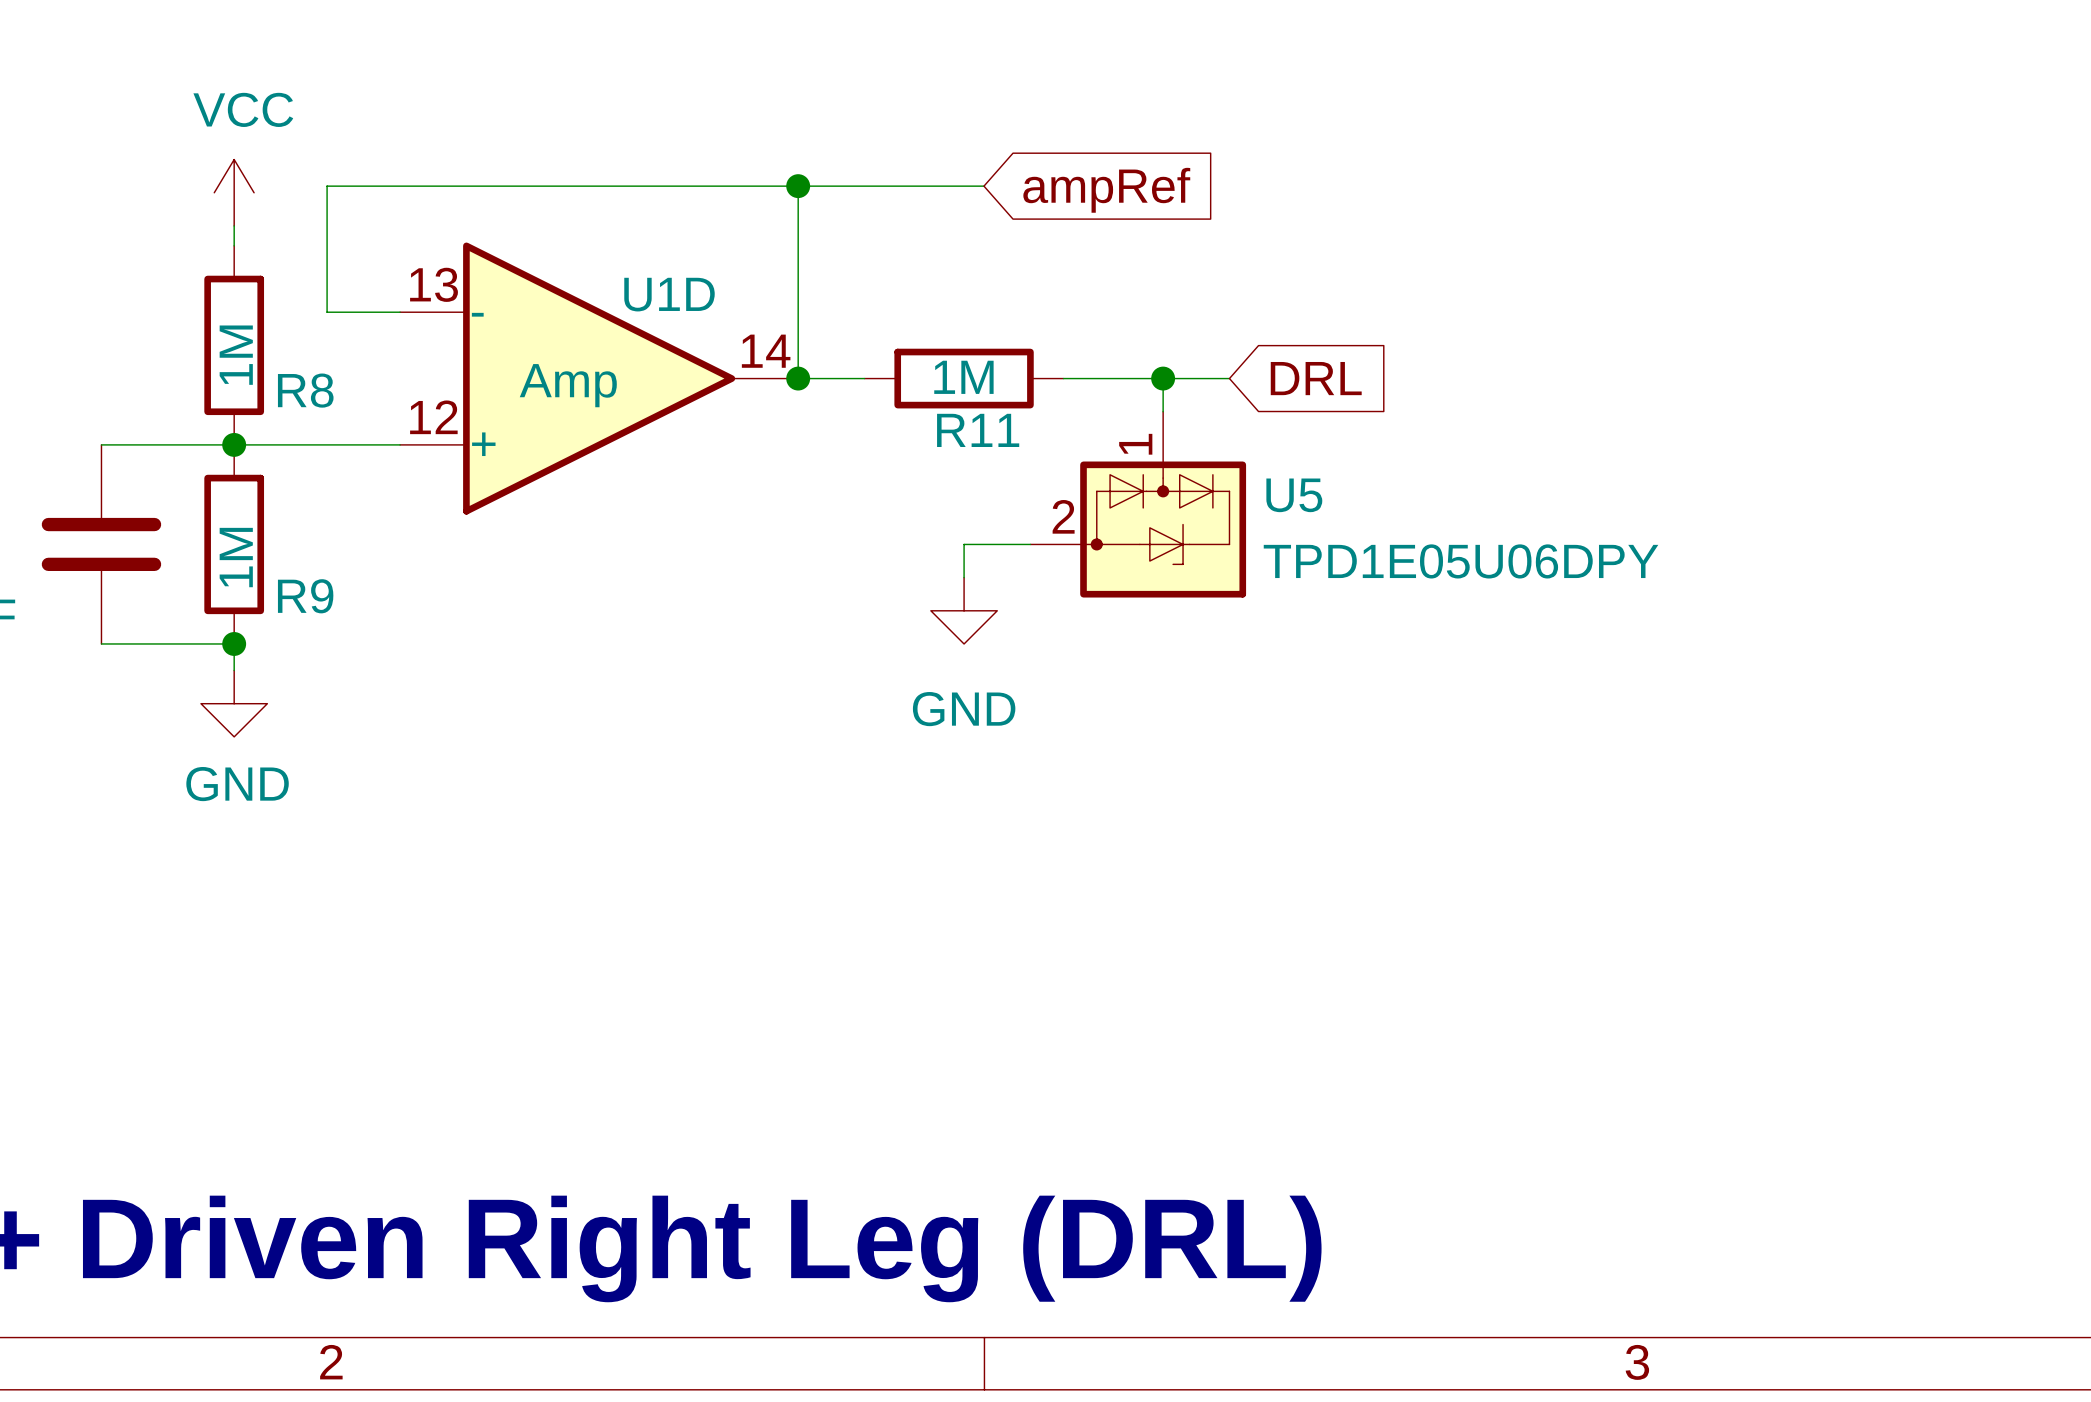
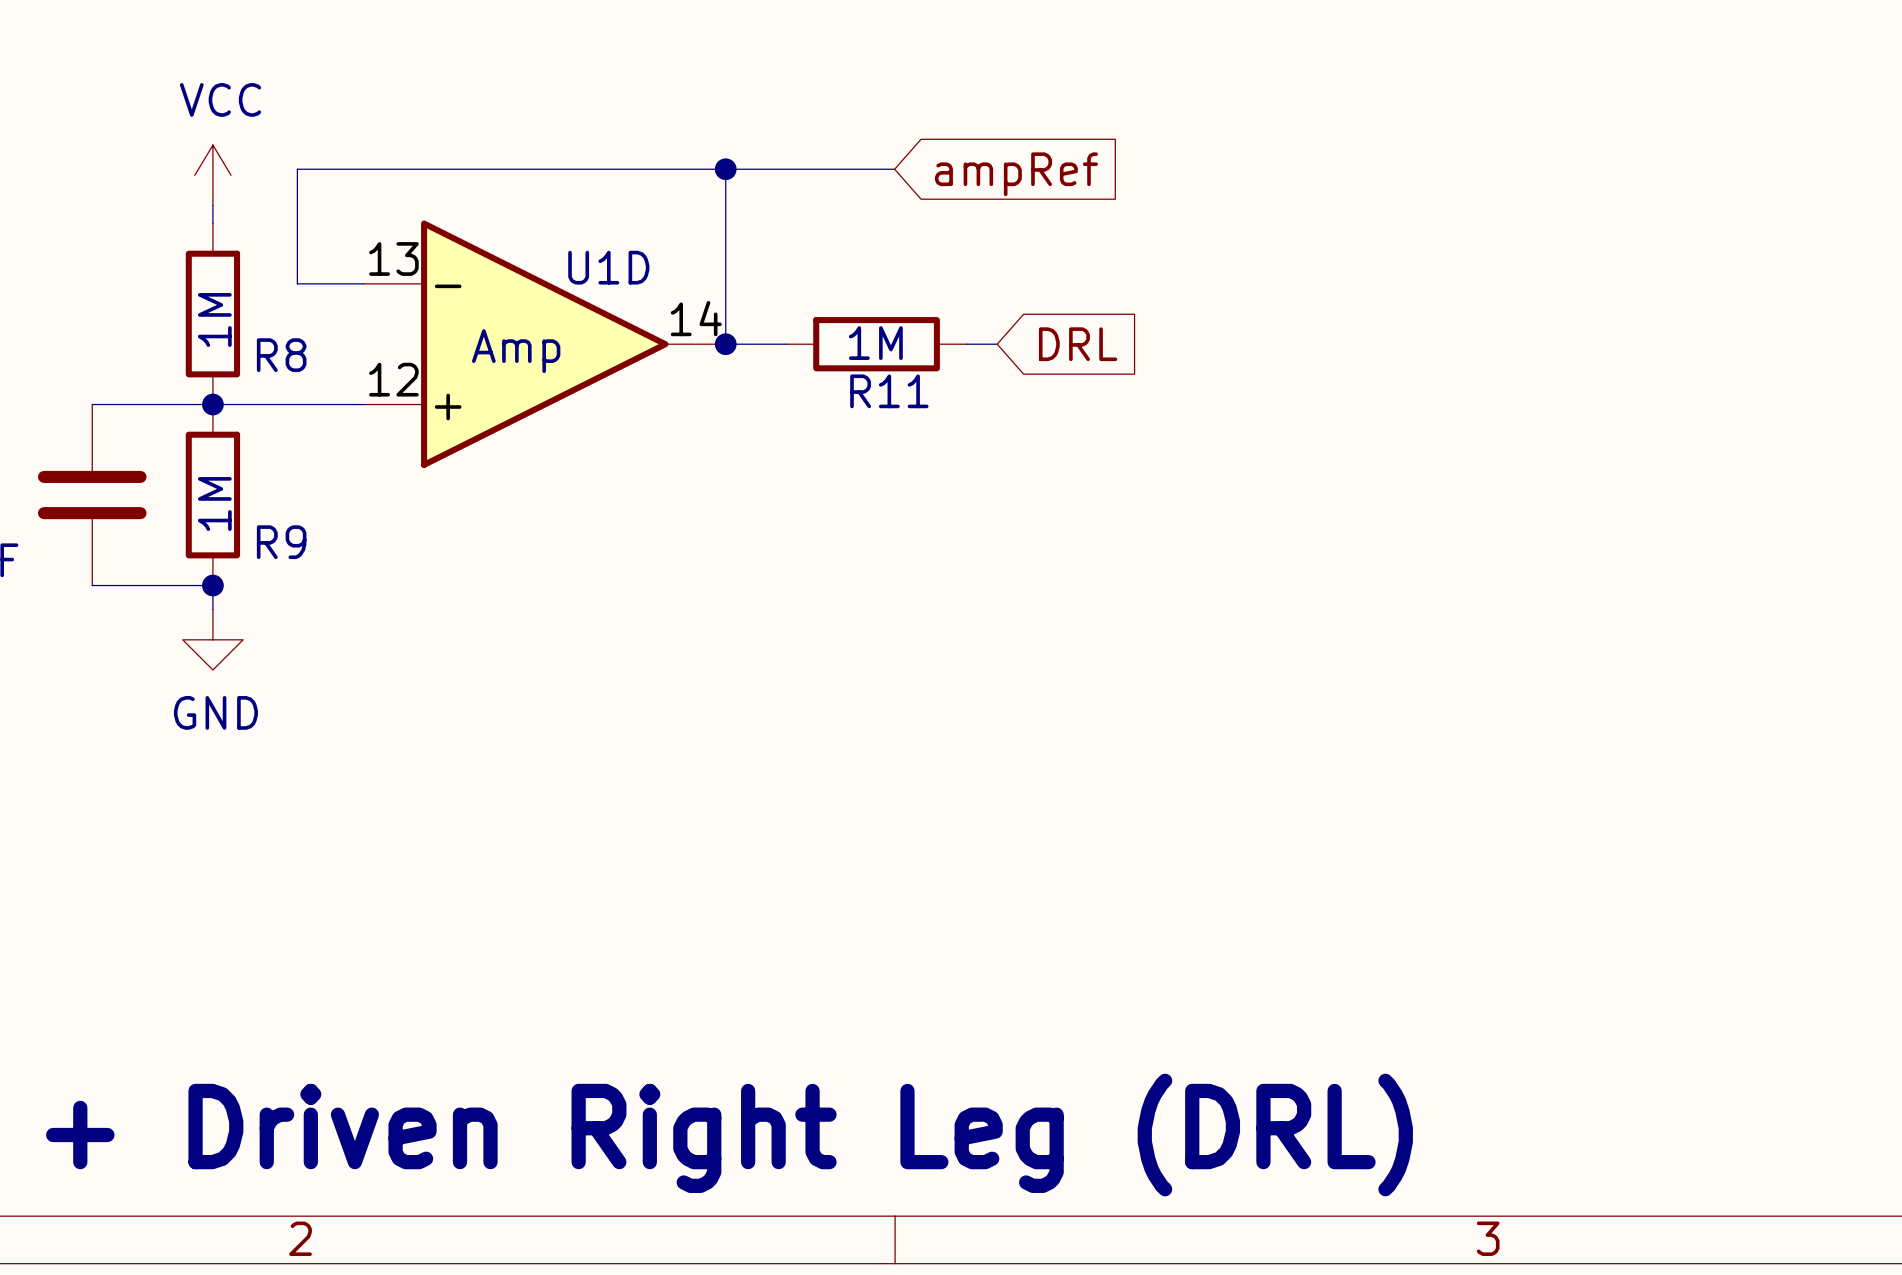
wire: (1096, 378) (1229, 378) -> none
wire: (1163, 378) (1163, 411) -> none
junction: (1163, 378) -> none
global label position: DRL (1316, 378) -> DRL (1078, 344)
U5: TPD1E05U06DPY (1138, 504) -> none
wire: (1030, 544) (964, 544) (964, 577) -> none
power symbol: GND (964, 610) -> none

